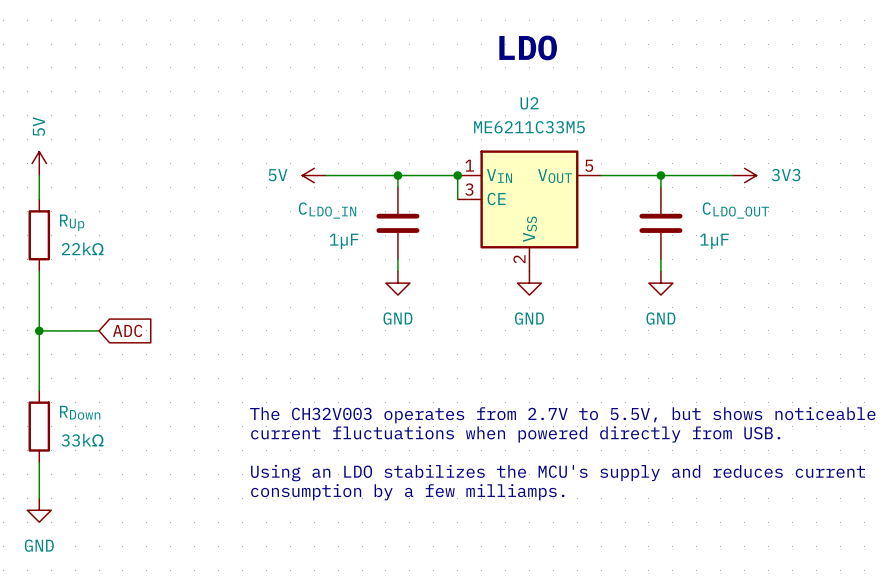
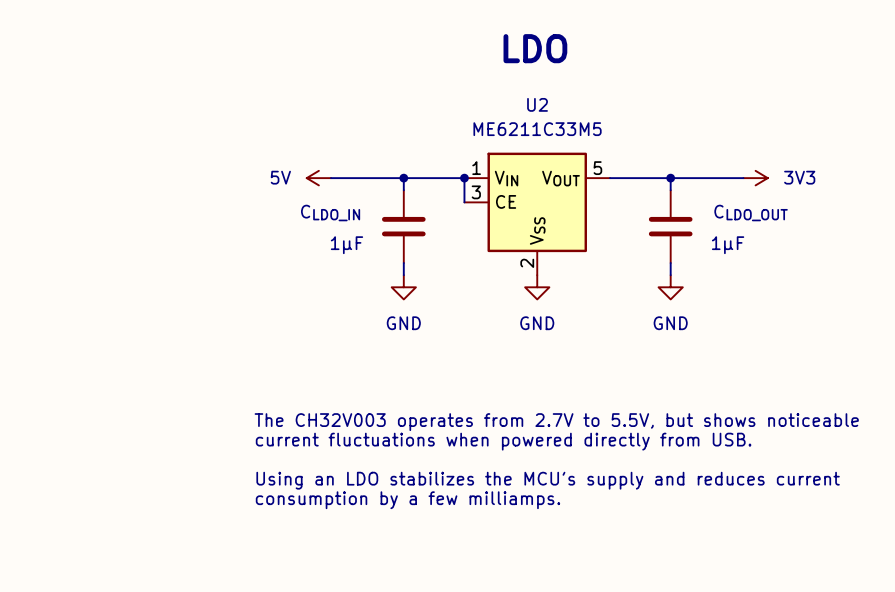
power symbol: 5V (39, 163) -> none
wire: (39, 175) (39, 199) -> none
RUp: 22kΩ (39, 235) -> none
wire: (39, 271) (39, 390) -> none
wire: (39, 330) (99, 330) -> none
junction: (39, 330) -> none
global label: ADC (127, 330) -> none
RDown: 33kΩ (39, 426) -> none
wire: (39, 462) (39, 498) -> none
power symbol: GND (39, 510) -> none

